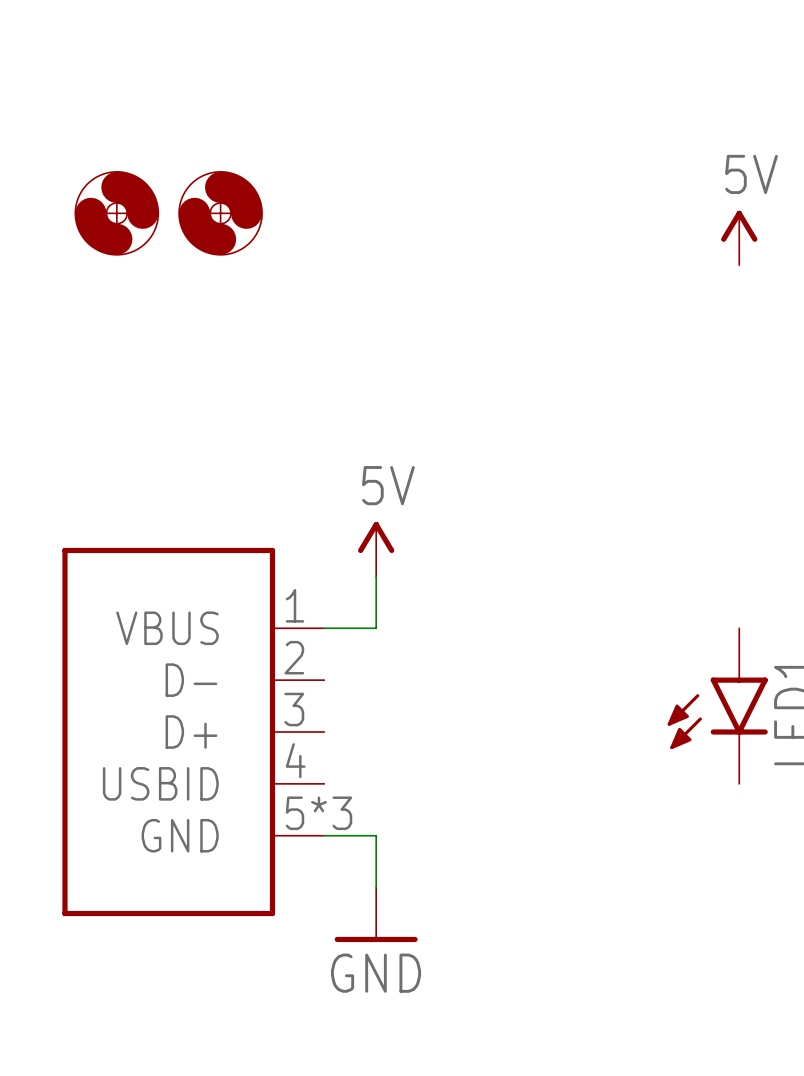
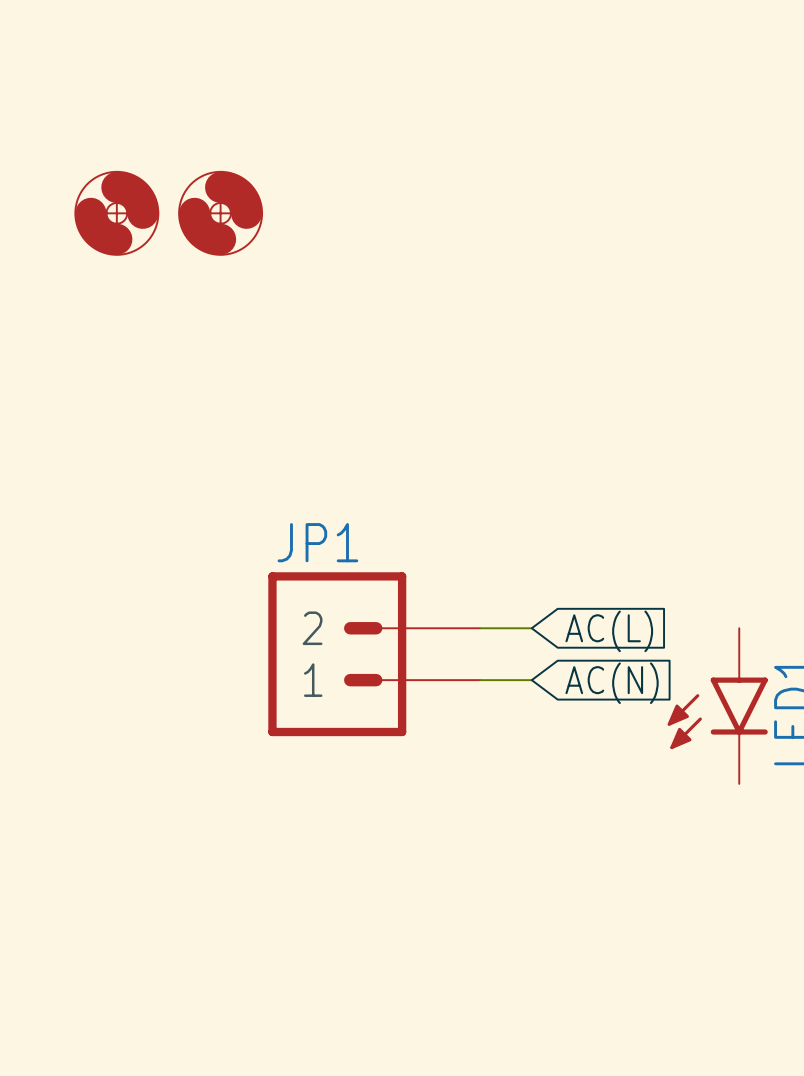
power symbol: 5V (739, 237) -> none
power symbol: 5V (376, 549) -> none
wire: (376, 576) (376, 628) (324, 628) -> none
wire: none -> (479, 628) (531, 628)
global label: none -> AC(L) (609, 631)
JP1: none -> (374, 654)
wire: none -> (479, 680) (531, 680)
global label: none -> AC(N) (612, 683)
part: (193, 732) -> none
wire: (324, 835) (376, 835) (376, 887) -> none
power symbol: GND (376, 914) -> none

